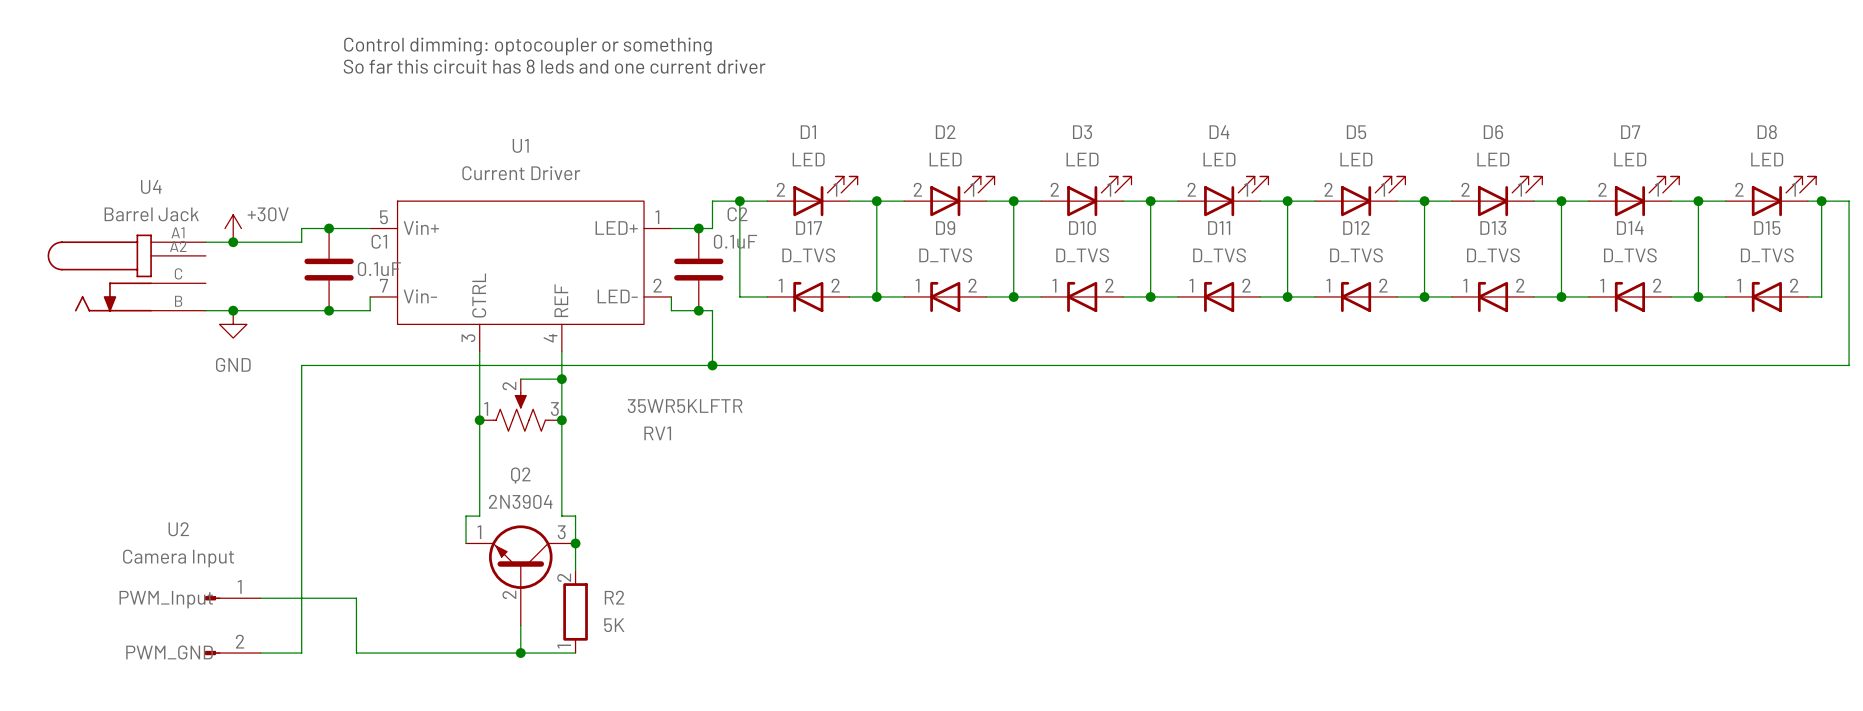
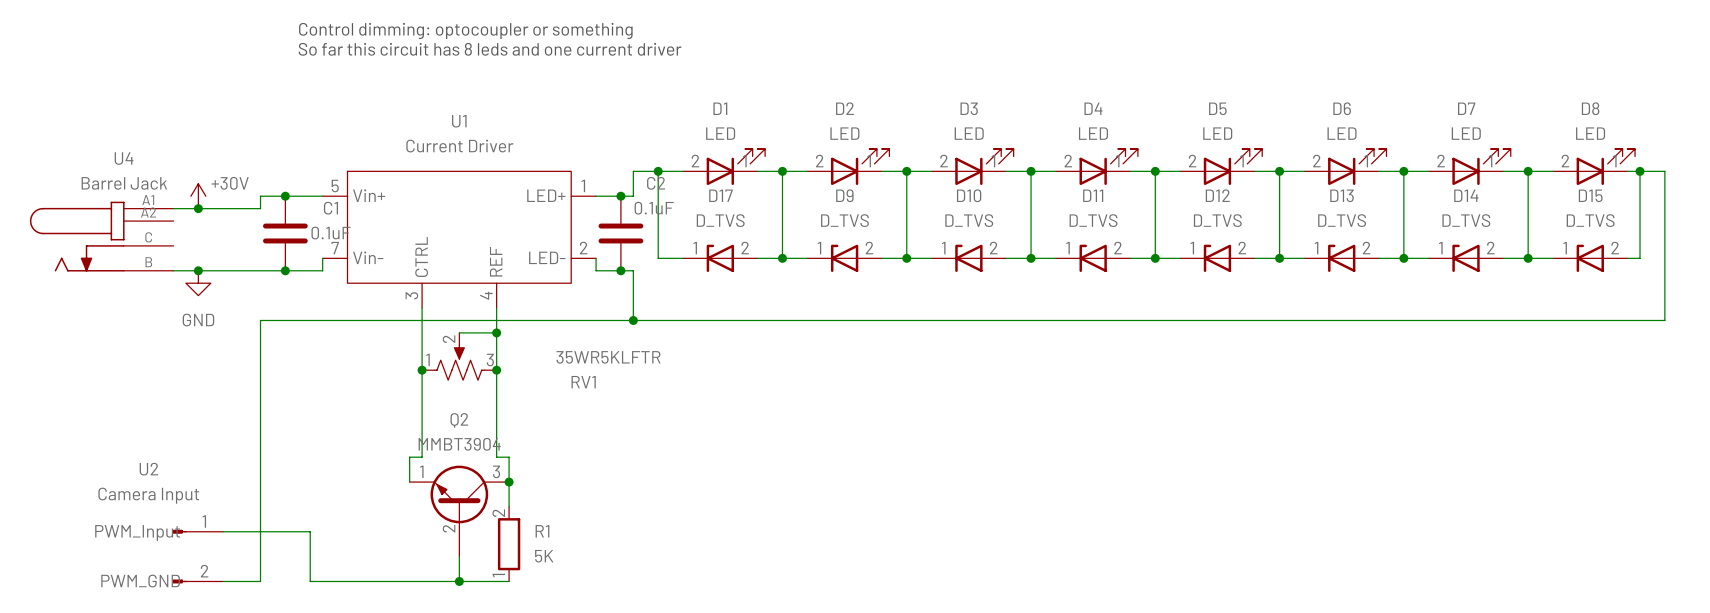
Q2 value: 2N3904 (520, 501) -> MMBT3904 (459, 444)
R2 name: R2 (614, 597) -> R1 (542, 531)

